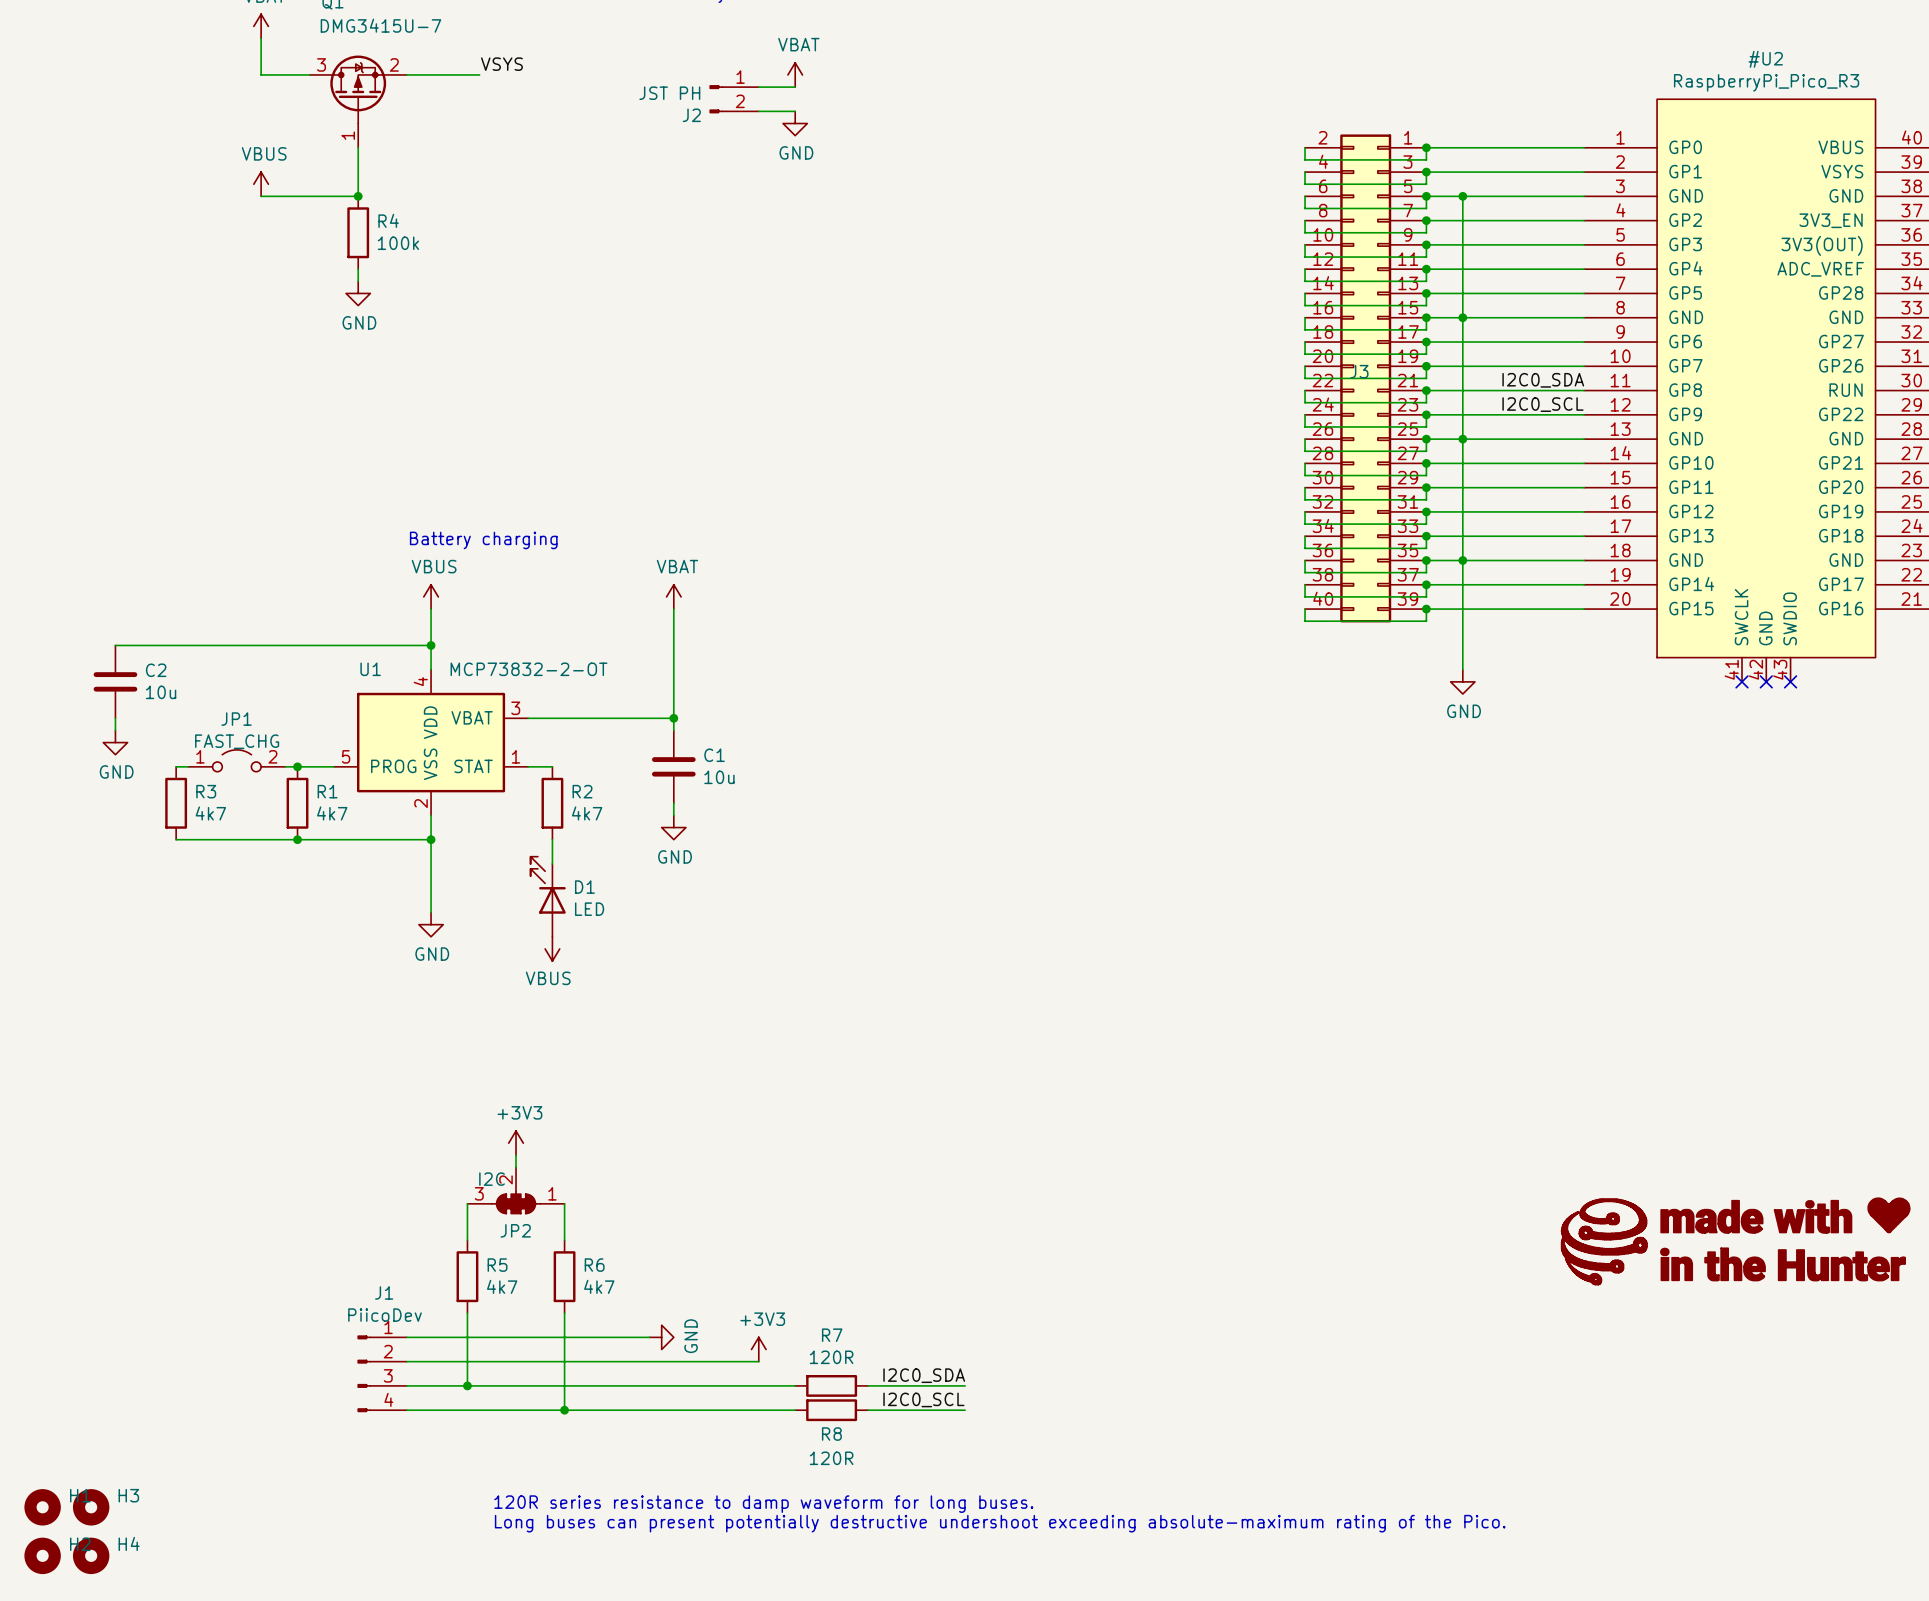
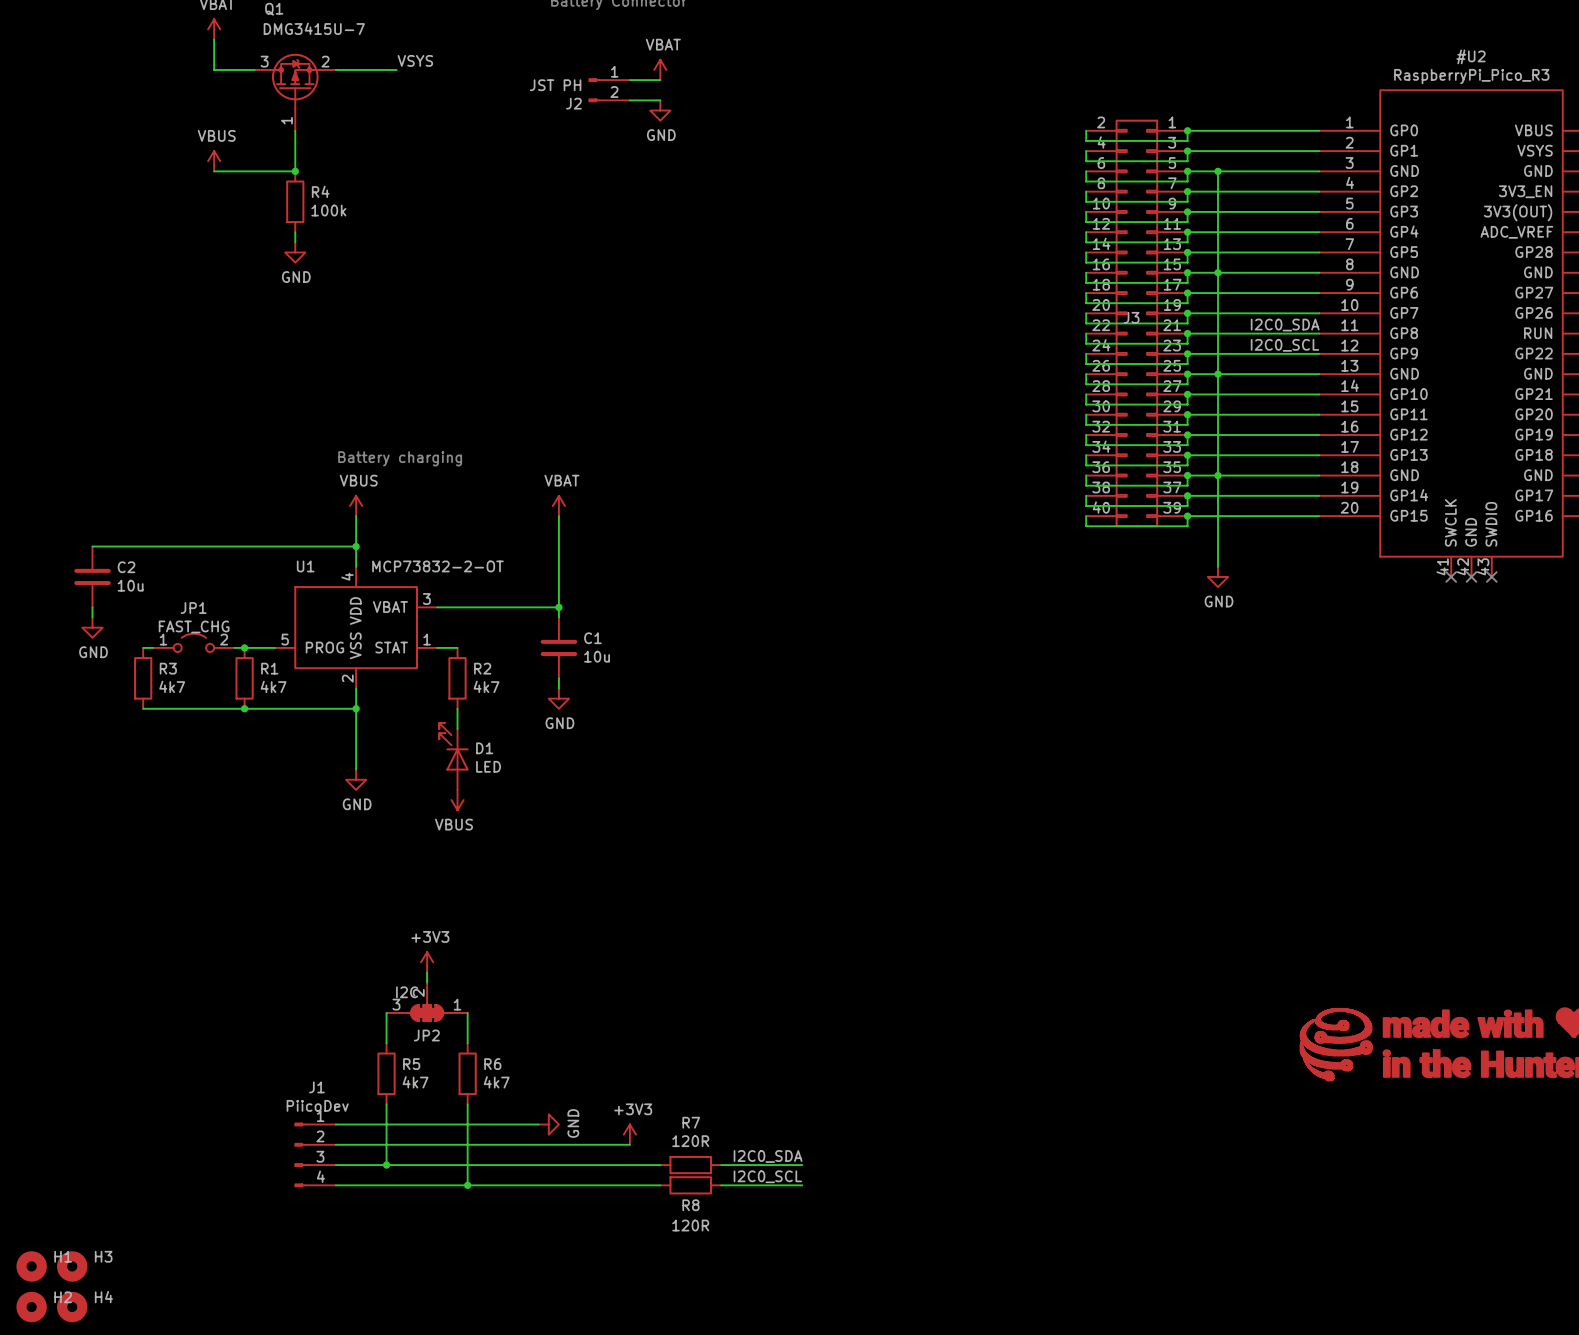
text: 120R series resistance to damp waveform for long buses. (763, 1504) -> none
text: Long buses can present potentially destructive undershoot exceeding absolute-maximum rating of the Pico. (1000, 1523) -> none

